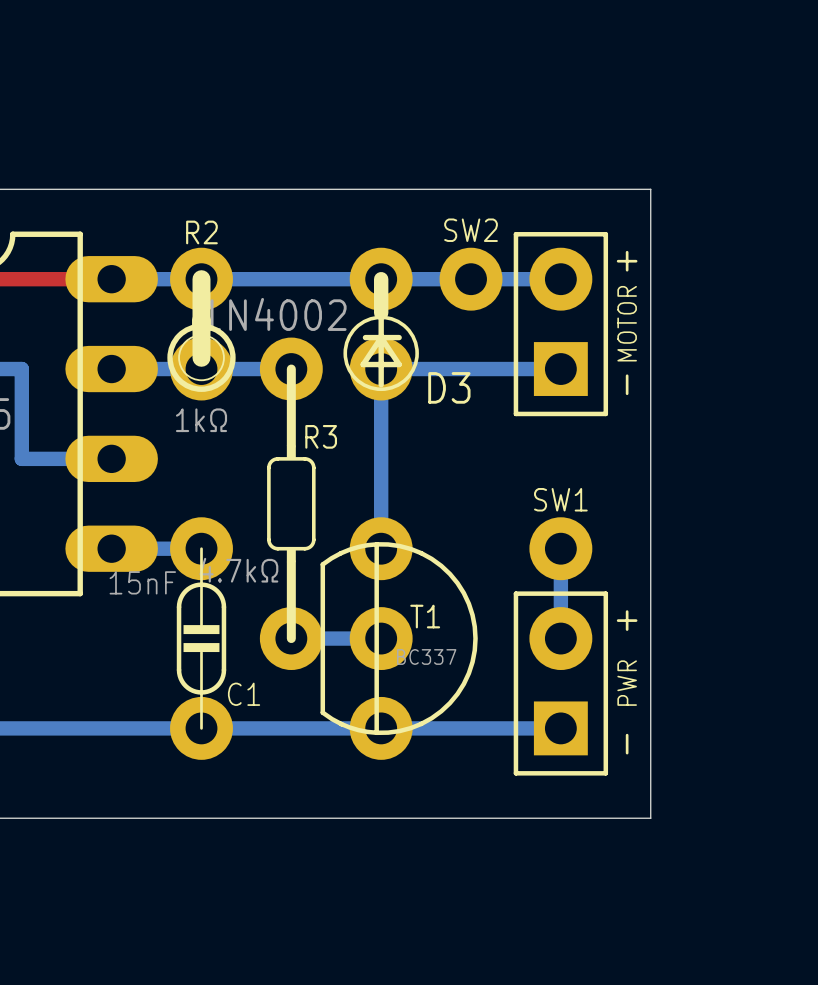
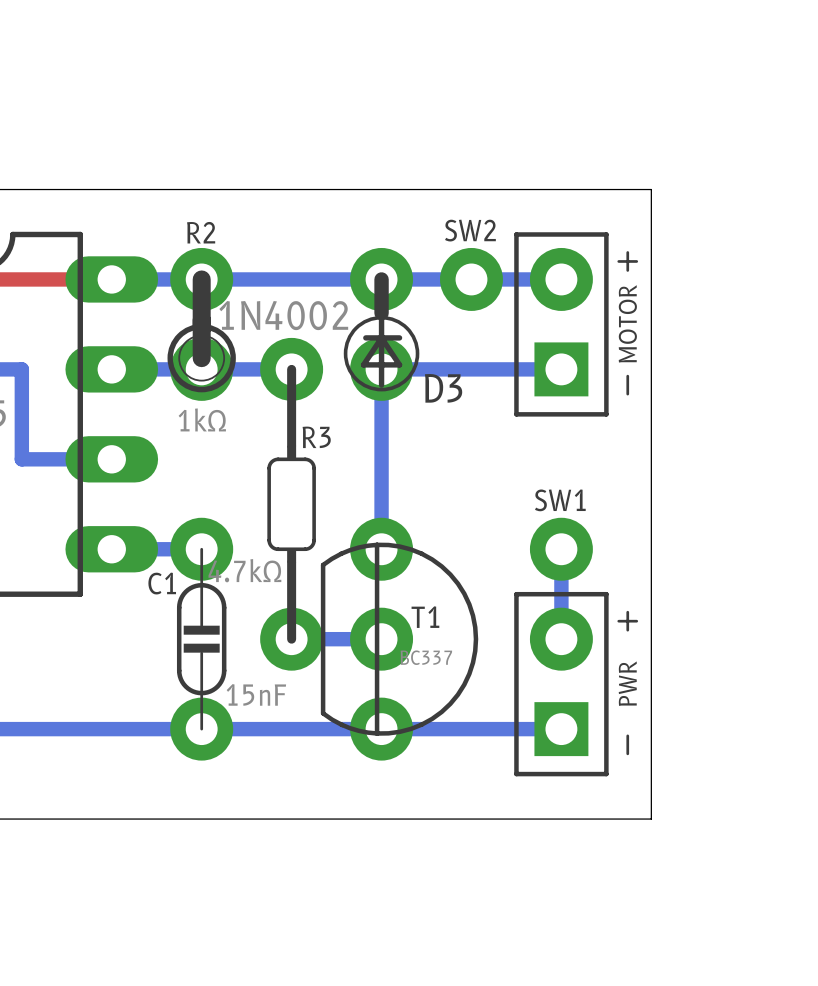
C1 value position: 15nF (142, 582) -> 15nF (256, 694)
C1 name position: C1 (244, 694) -> C1 (162, 583)

